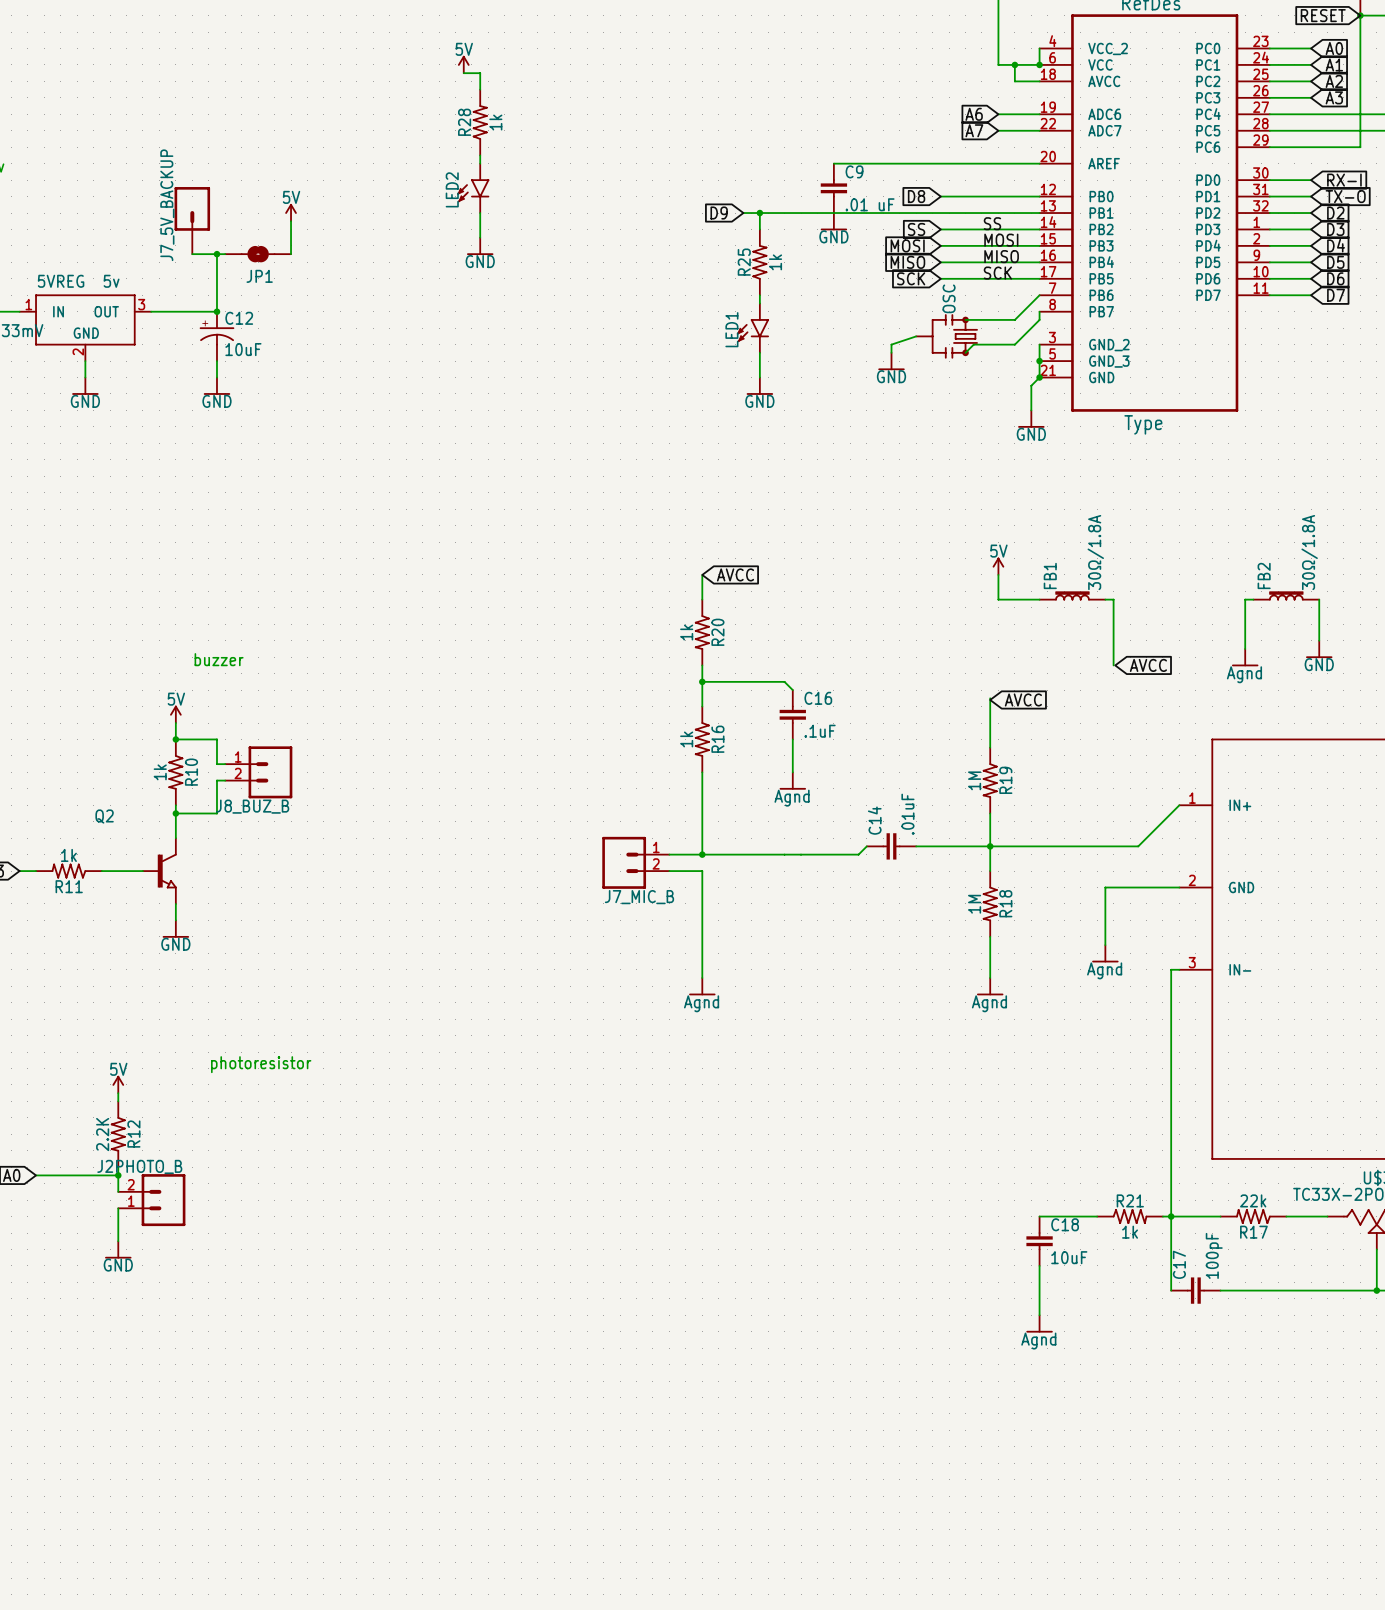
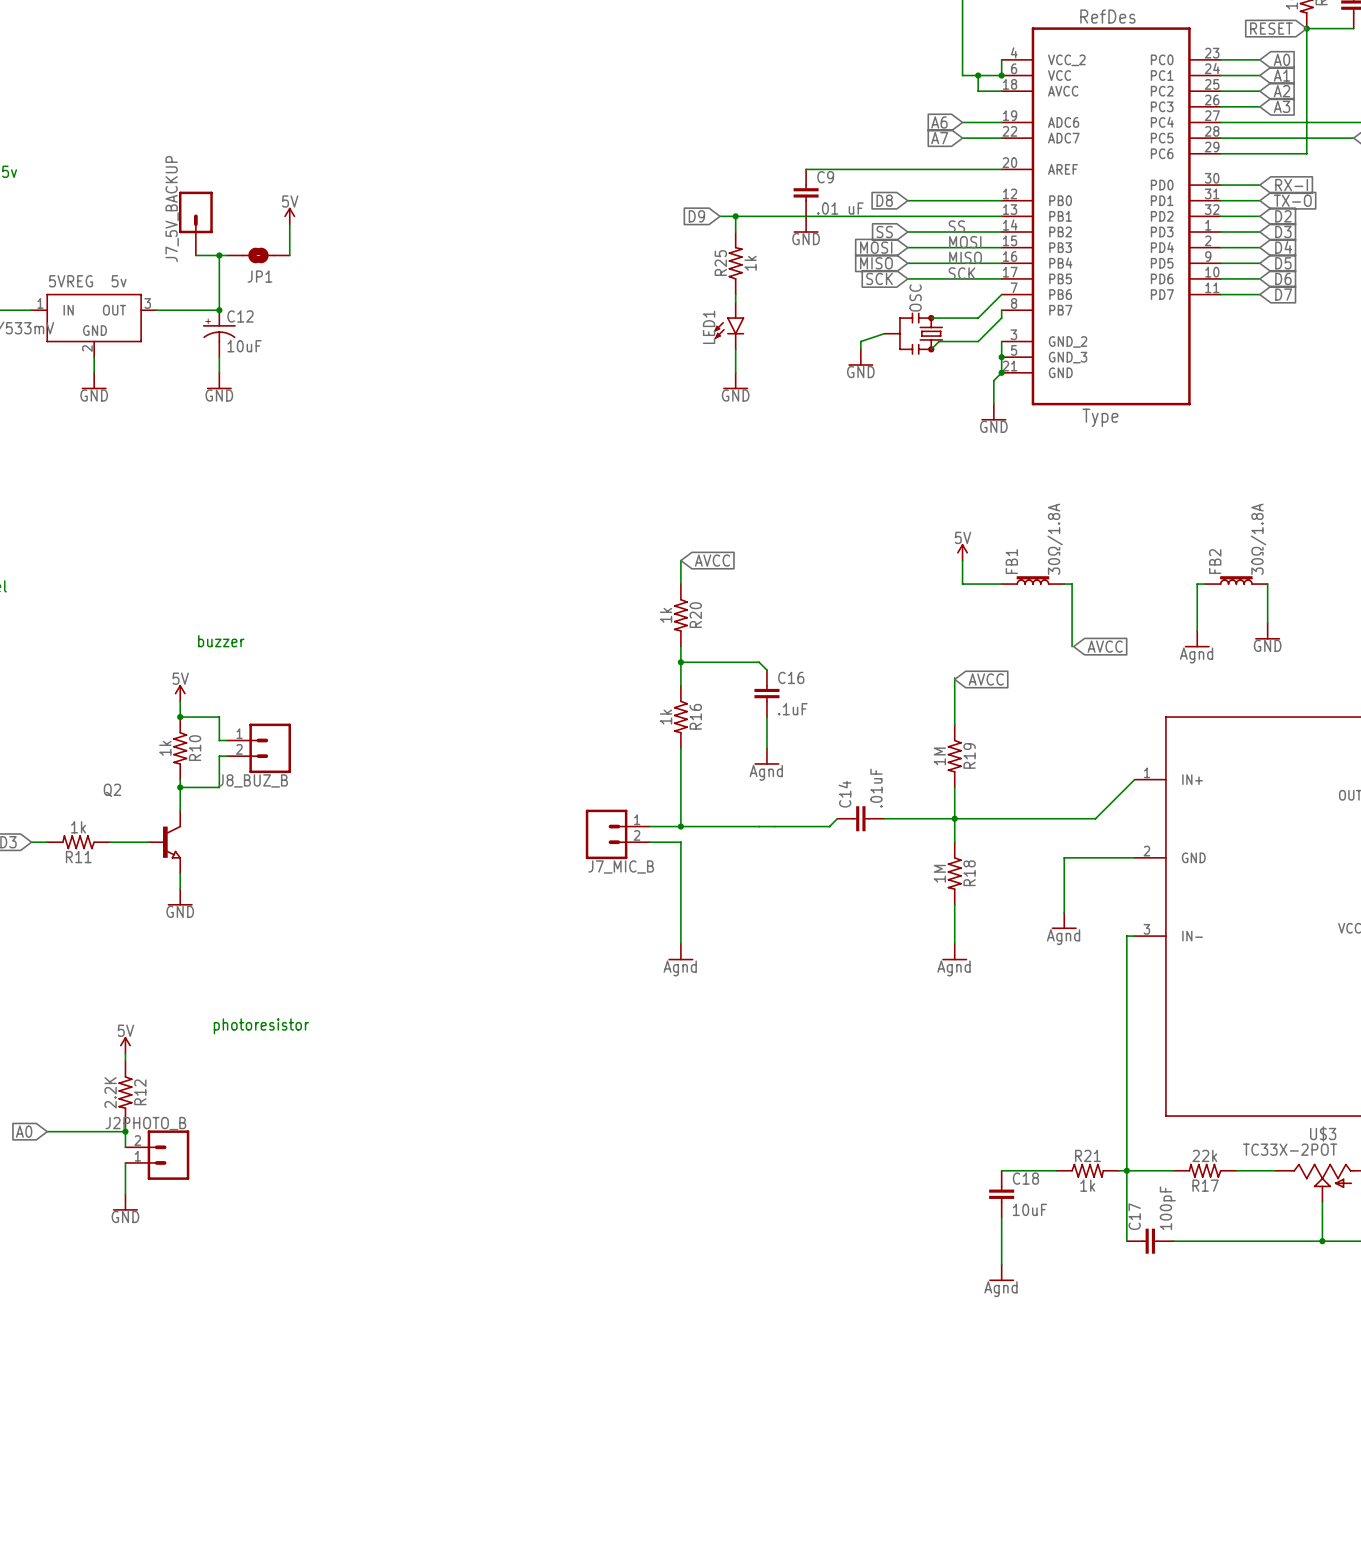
power symbol: 5V (463, 64) -> none
wire: (463, 73) (480, 73) (480, 89) -> none
R28: 1k (480, 122) -> none
wire: (480, 155) (480, 163) -> none
LED2: (473, 188) -> none
wire: (480, 213) (480, 237) -> none
power symbol: GND (480, 246) -> none

